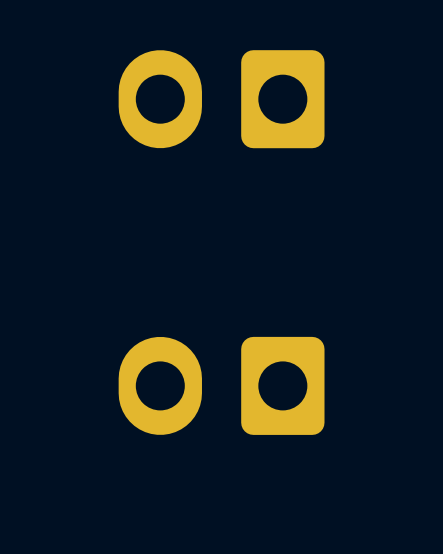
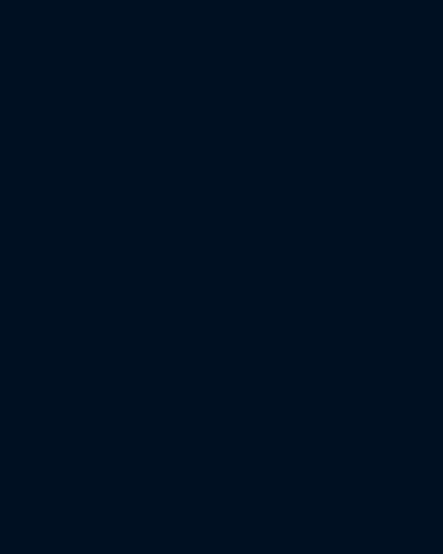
part: (221, 99) -> none
part: (221, 385) -> none

